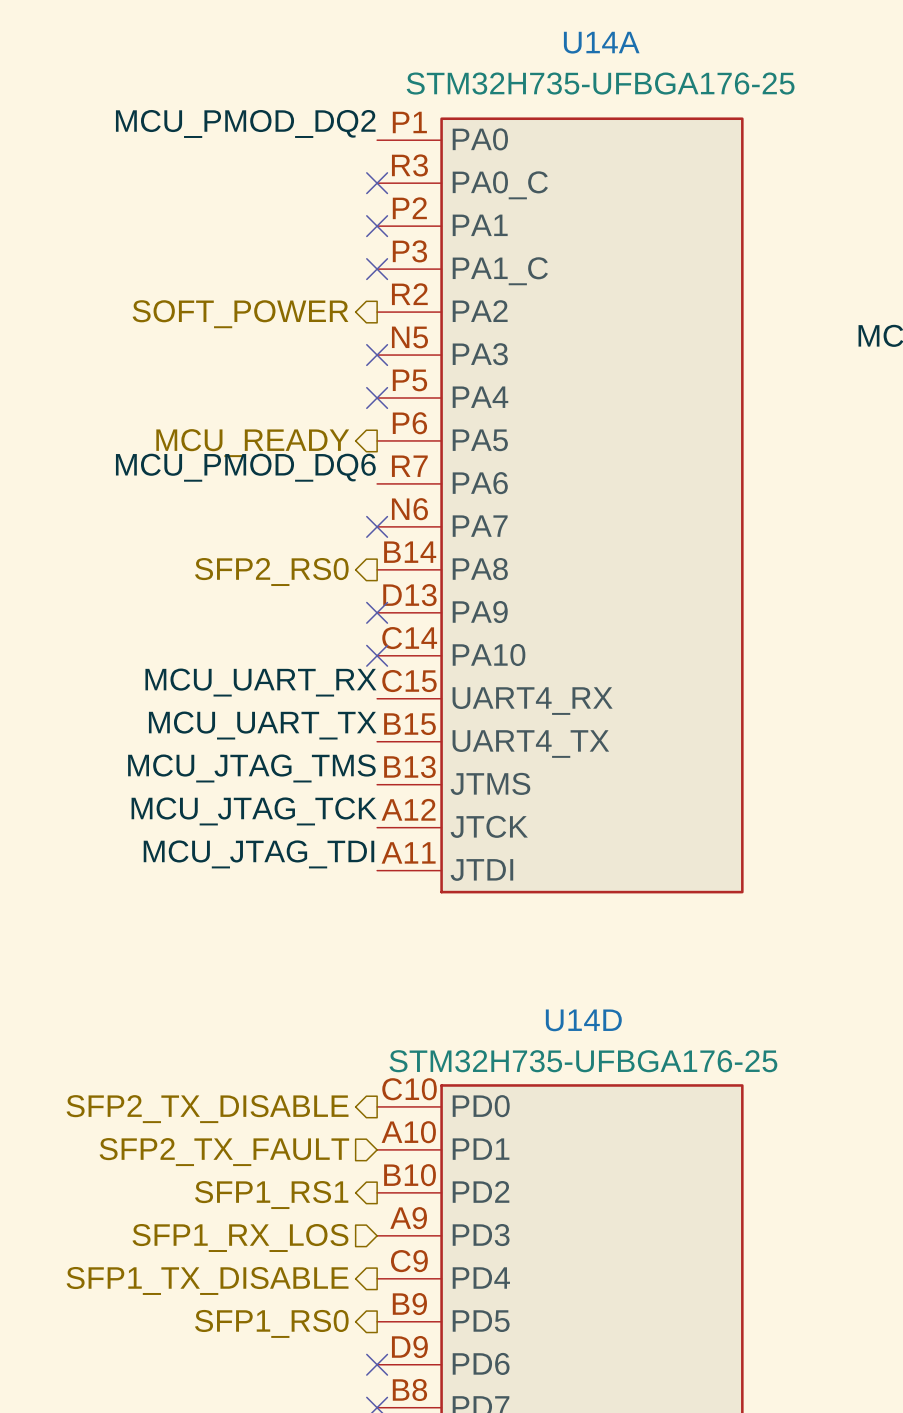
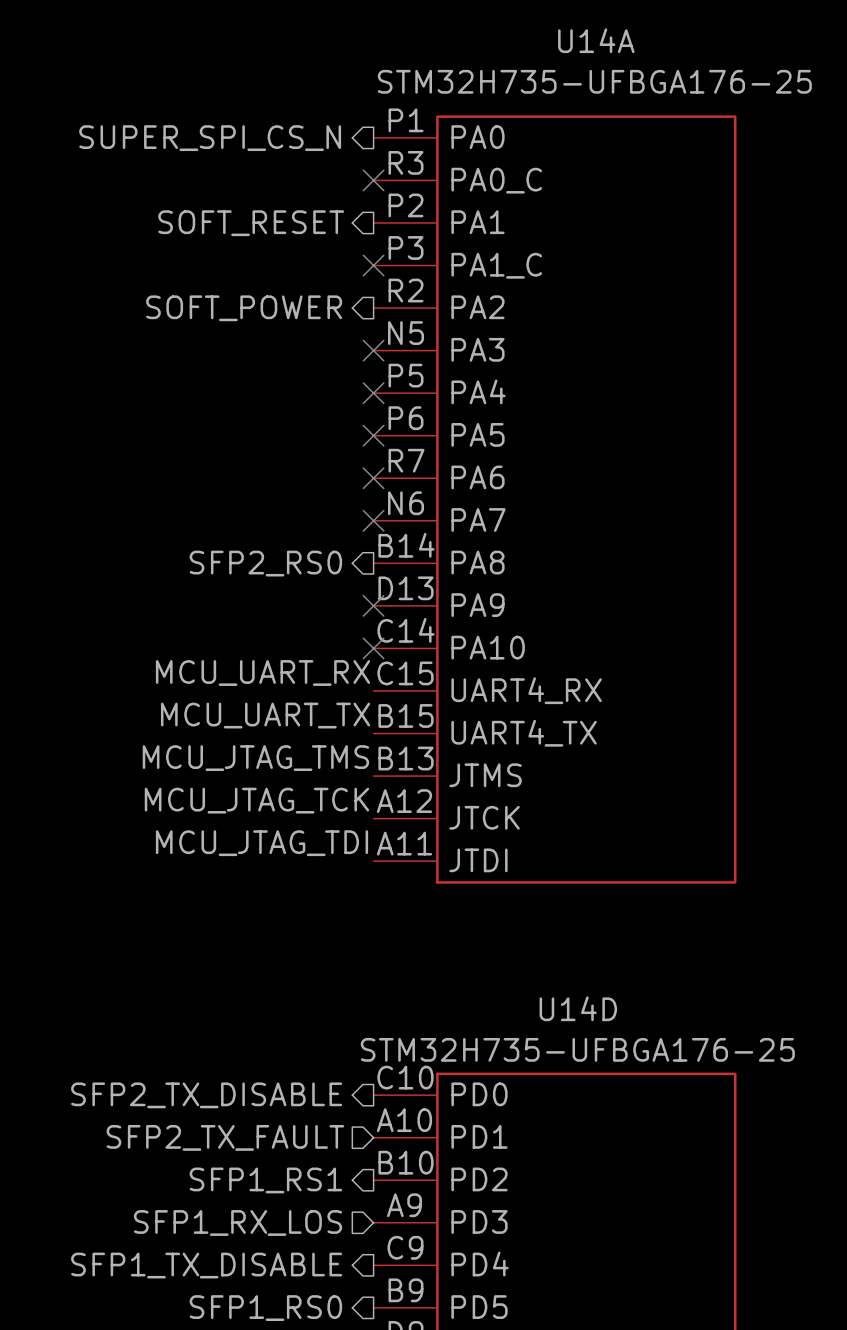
label: MCU_PMOD_DQ2 (245, 123) -> none
hierarchical label: none -> SUPER_SPI_CS_N (210, 138)
no-connect mark: (377, 226) -> none
hierarchical label: none -> SOFT_RESET (251, 223)
no-connect mark: none -> (373, 435)
hierarchical label: MCU_READY (252, 443) -> none
label: MCU_PMOD_DQ6 (245, 467) -> none
no-connect mark: none -> (373, 478)

